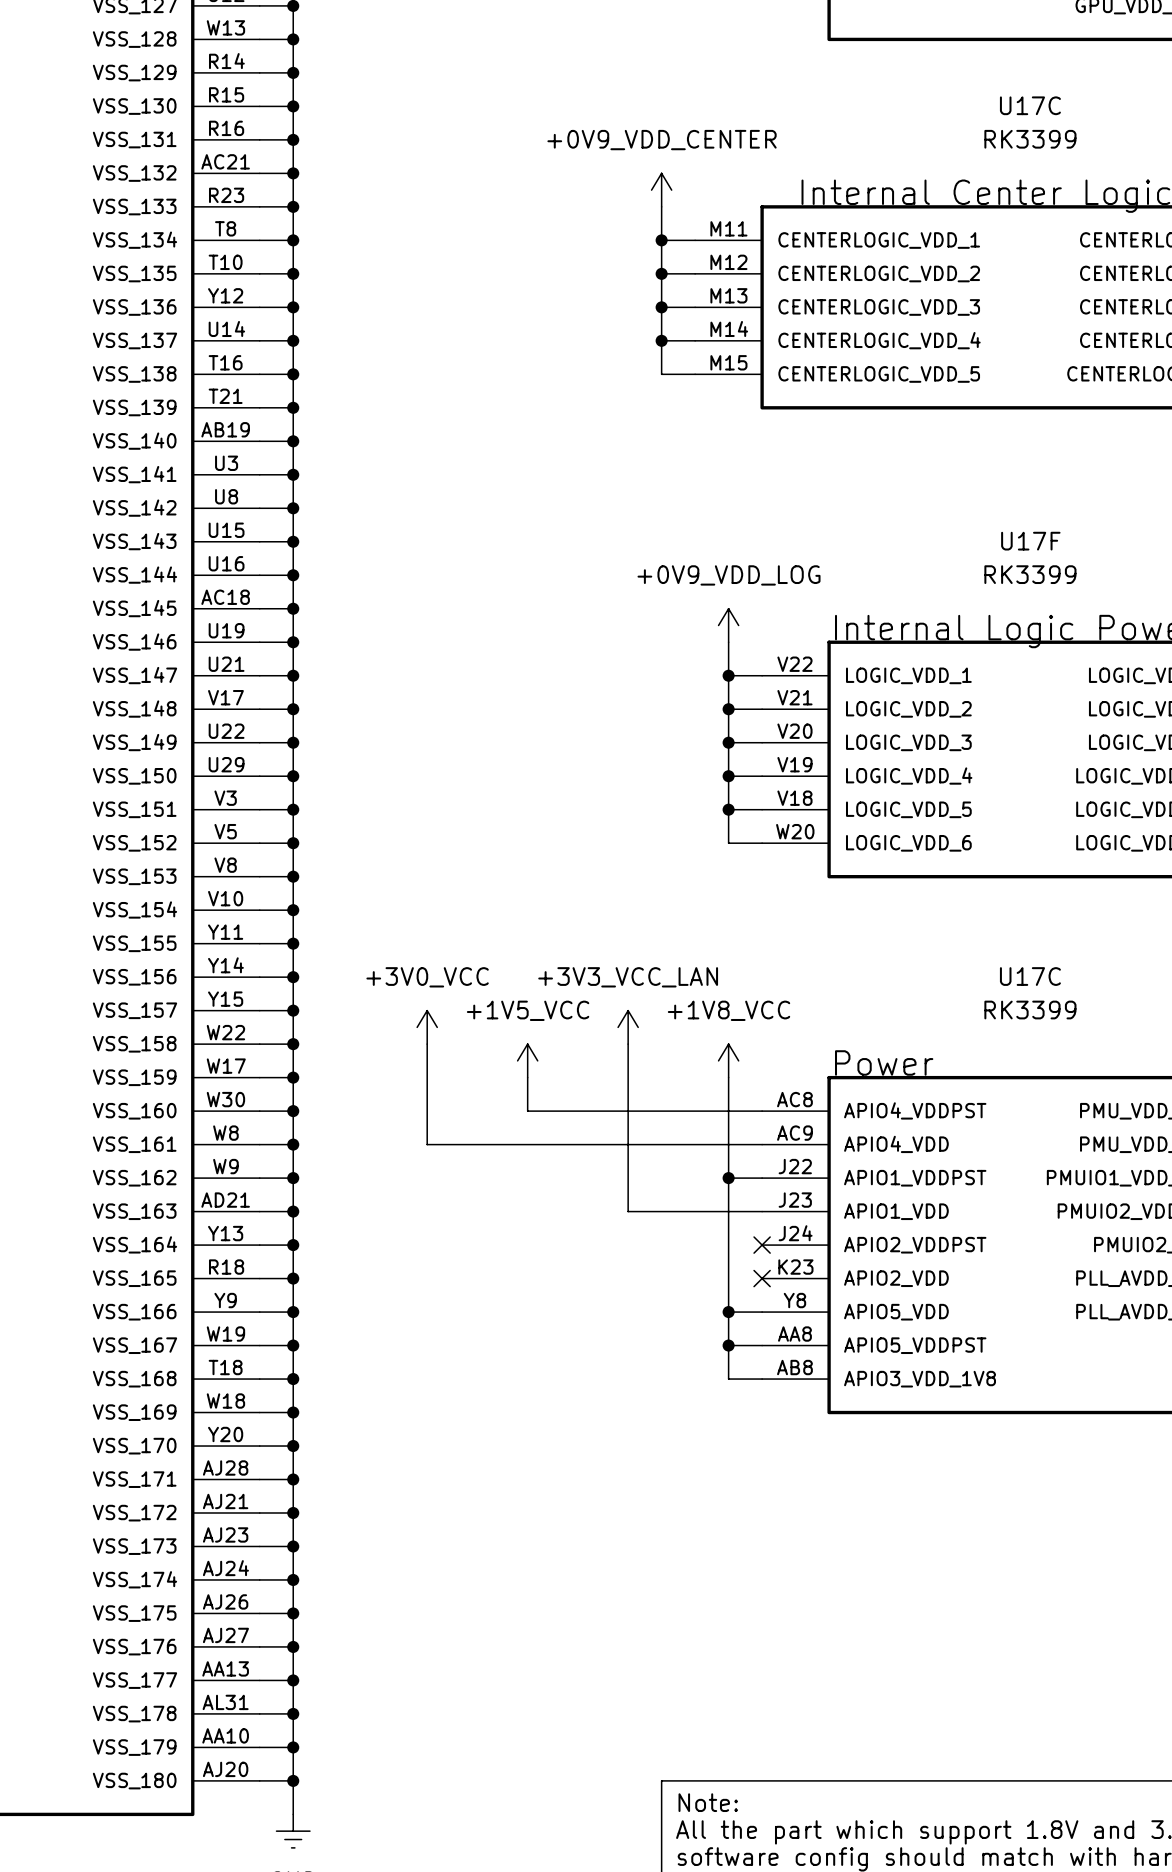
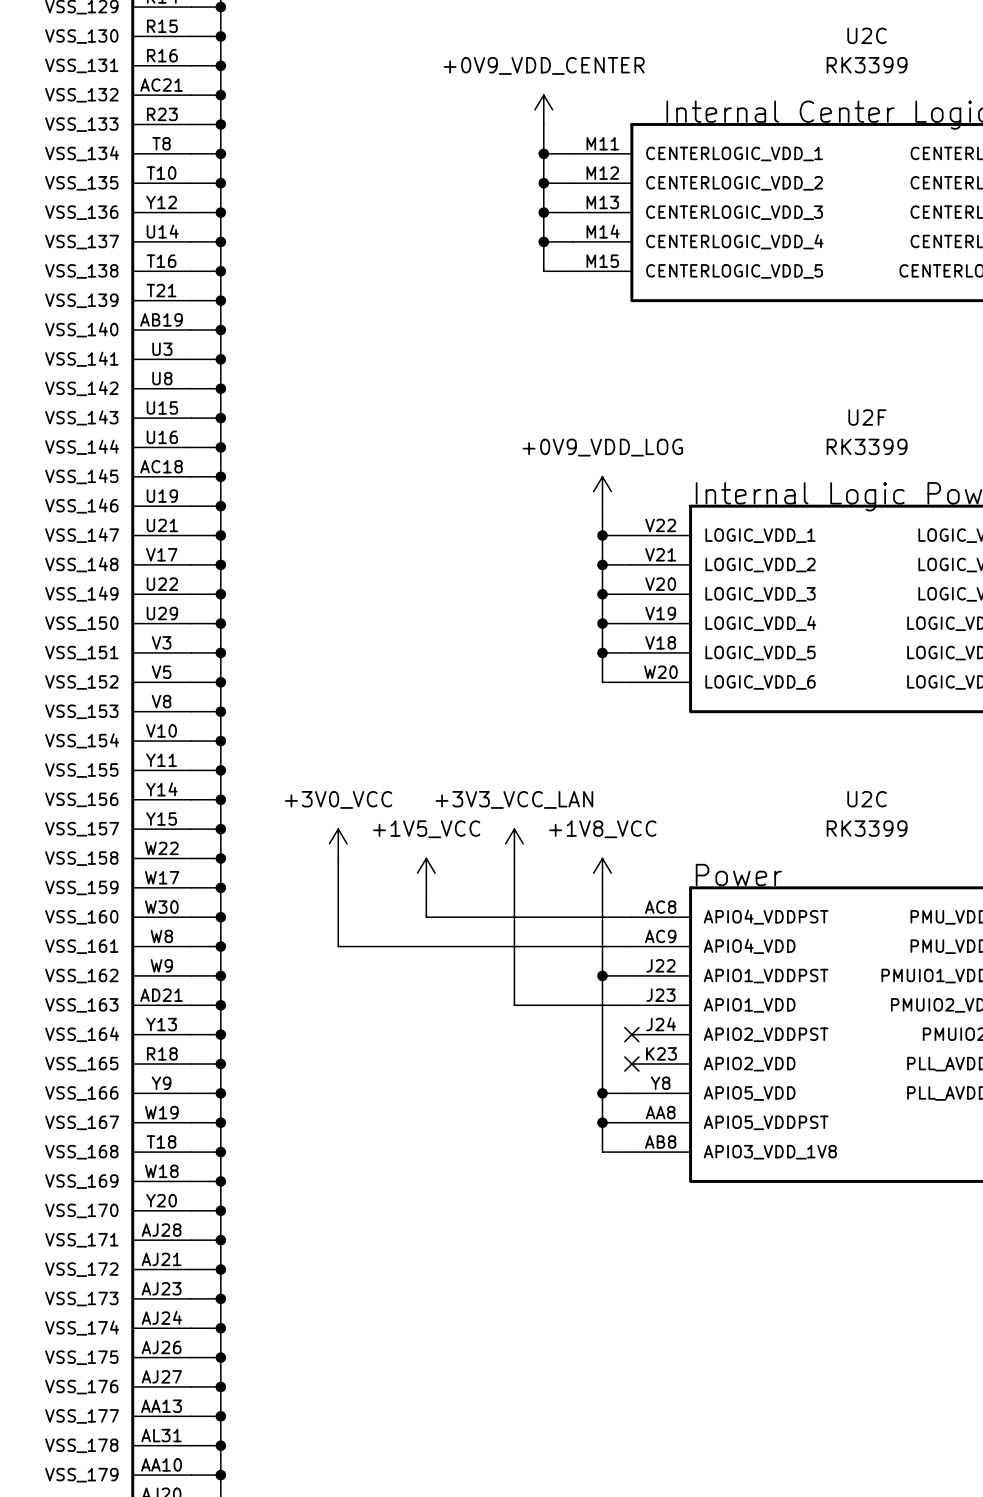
U17C name: U17C (1030, 105) -> U2C (867, 35)
U17F name: U17F (1030, 541) -> U2F (867, 417)
U17C name: U17C (1030, 976) -> U2C (867, 799)

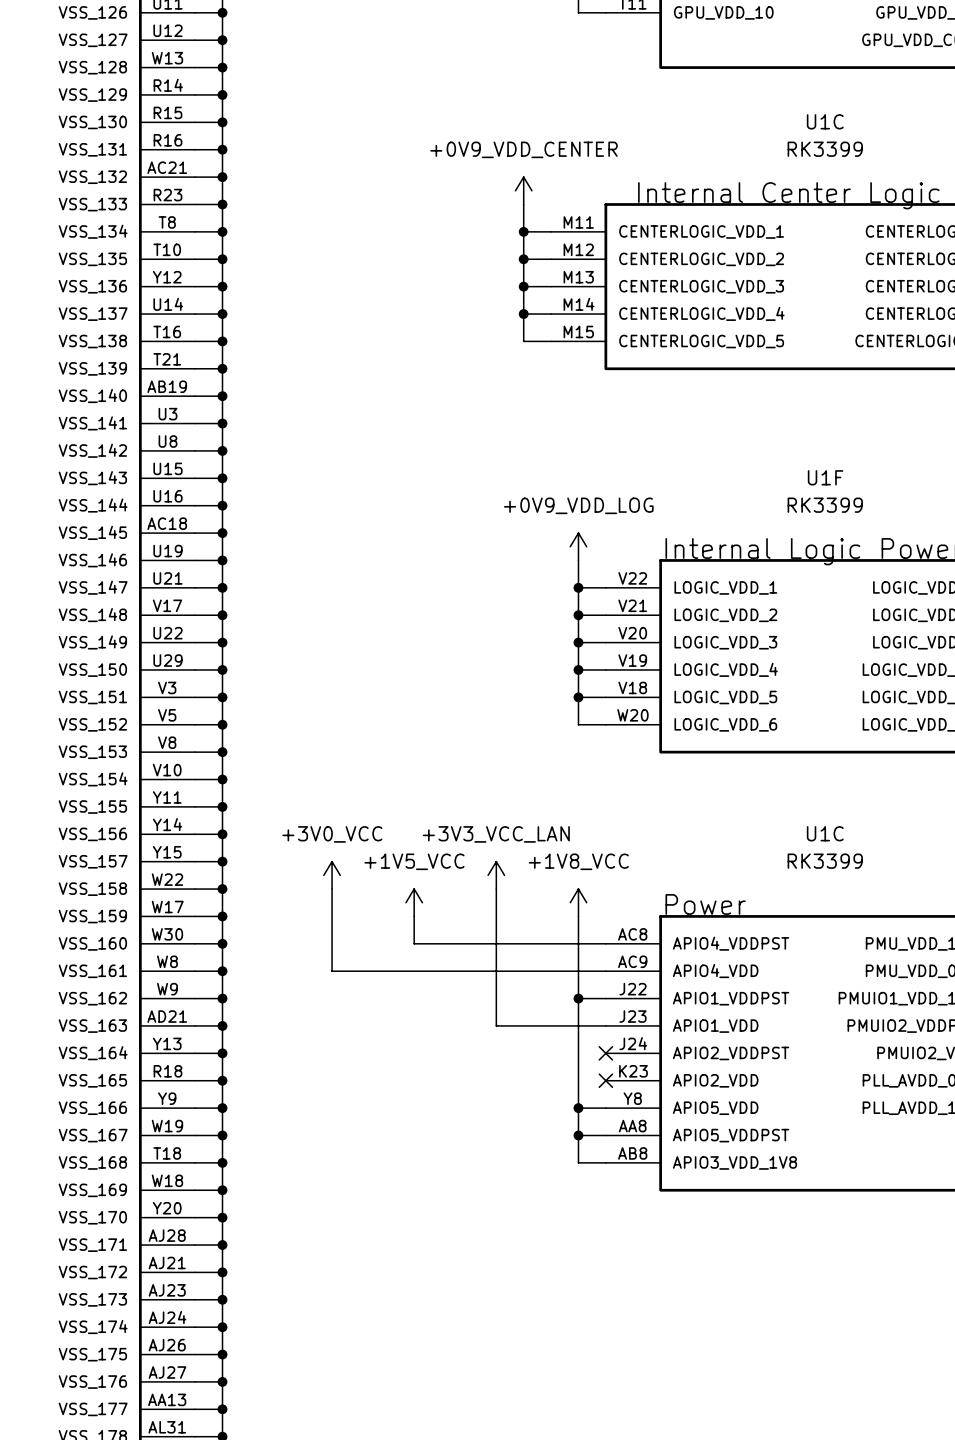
U2C name: U2C (867, 35) -> U1C (825, 121)
U2F name: U2F (867, 417) -> U1F (825, 477)
U2C name: U2C (867, 799) -> U1C (825, 833)

